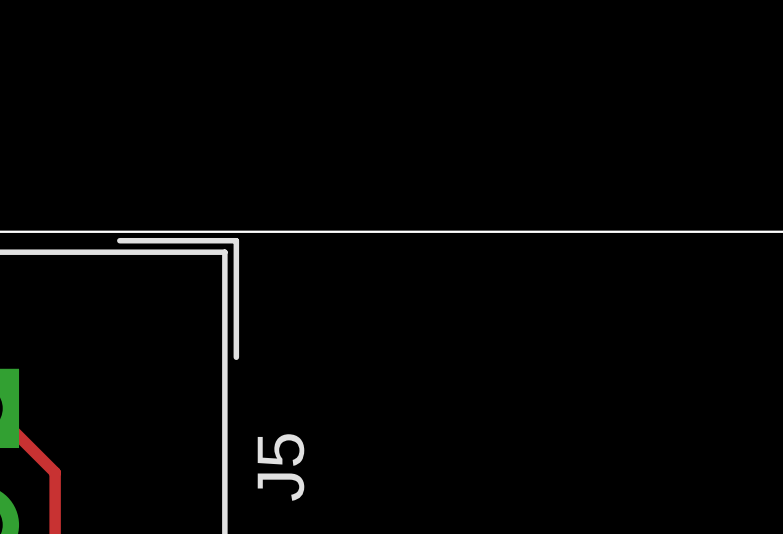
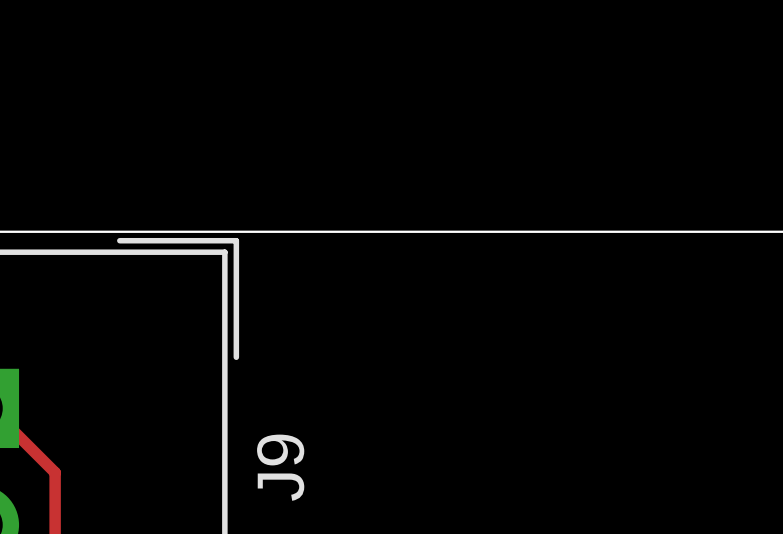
J5 name: J5 (281, 467) -> J9 (280, 467)

